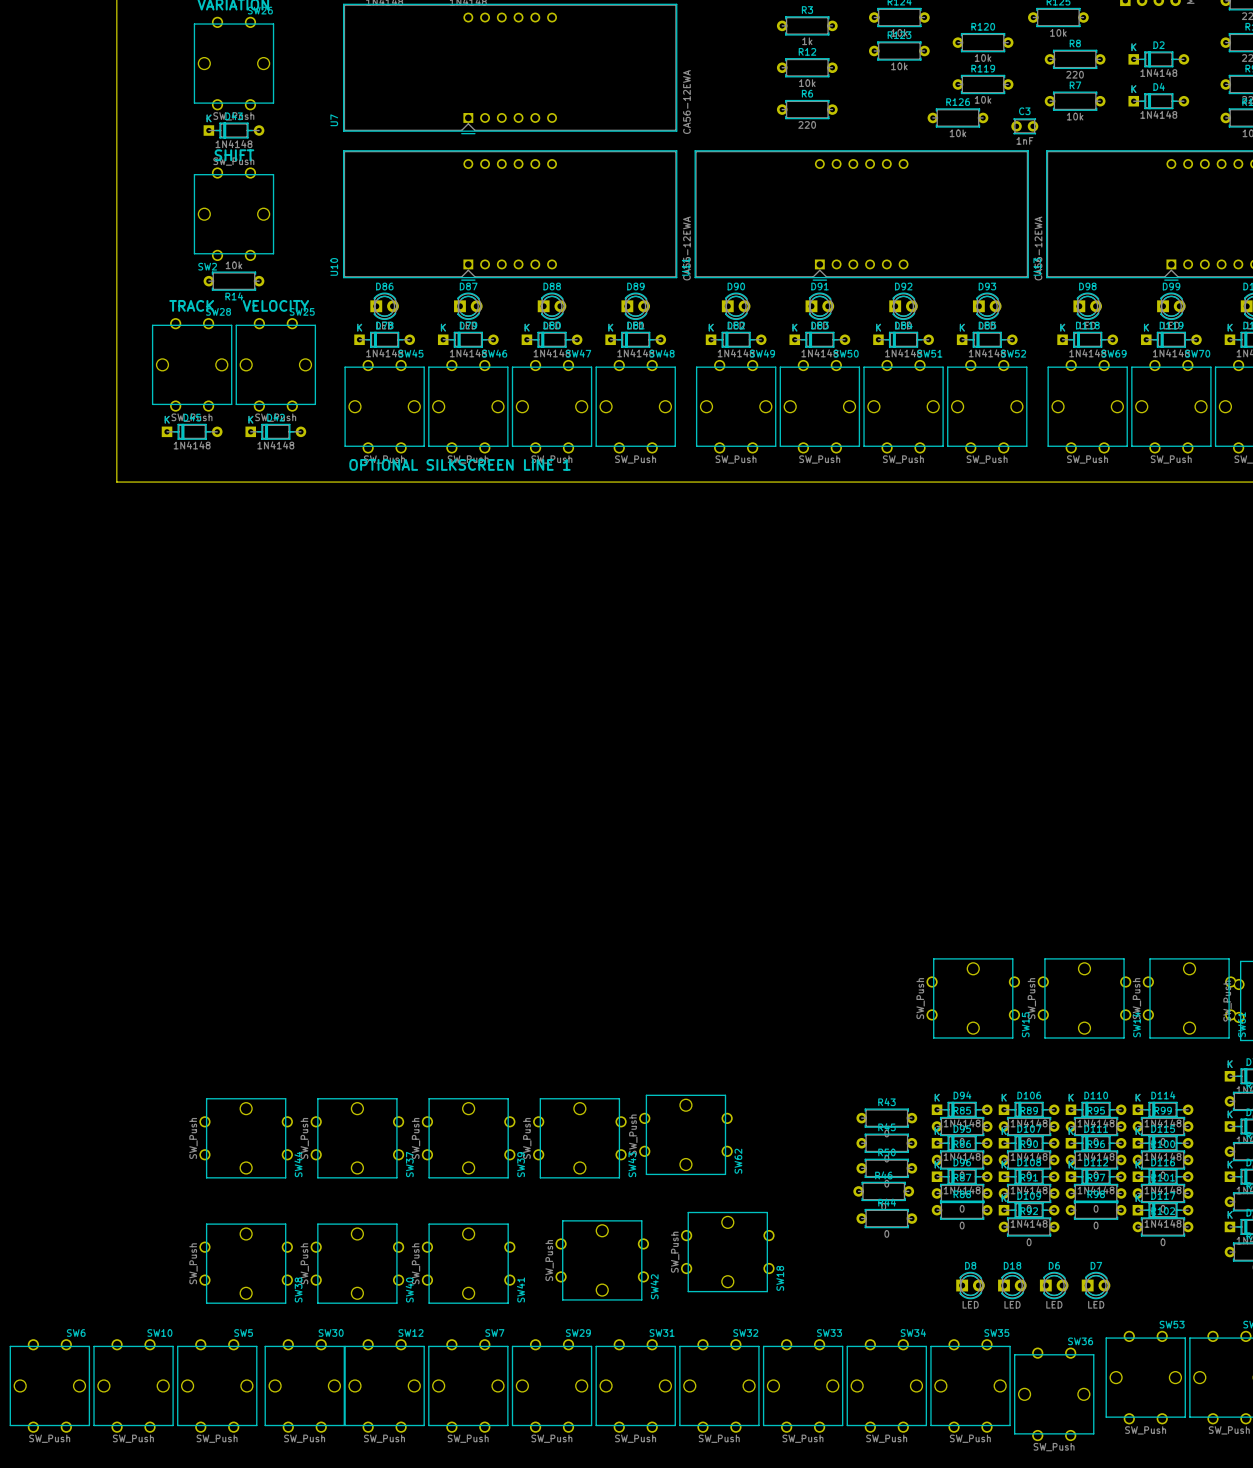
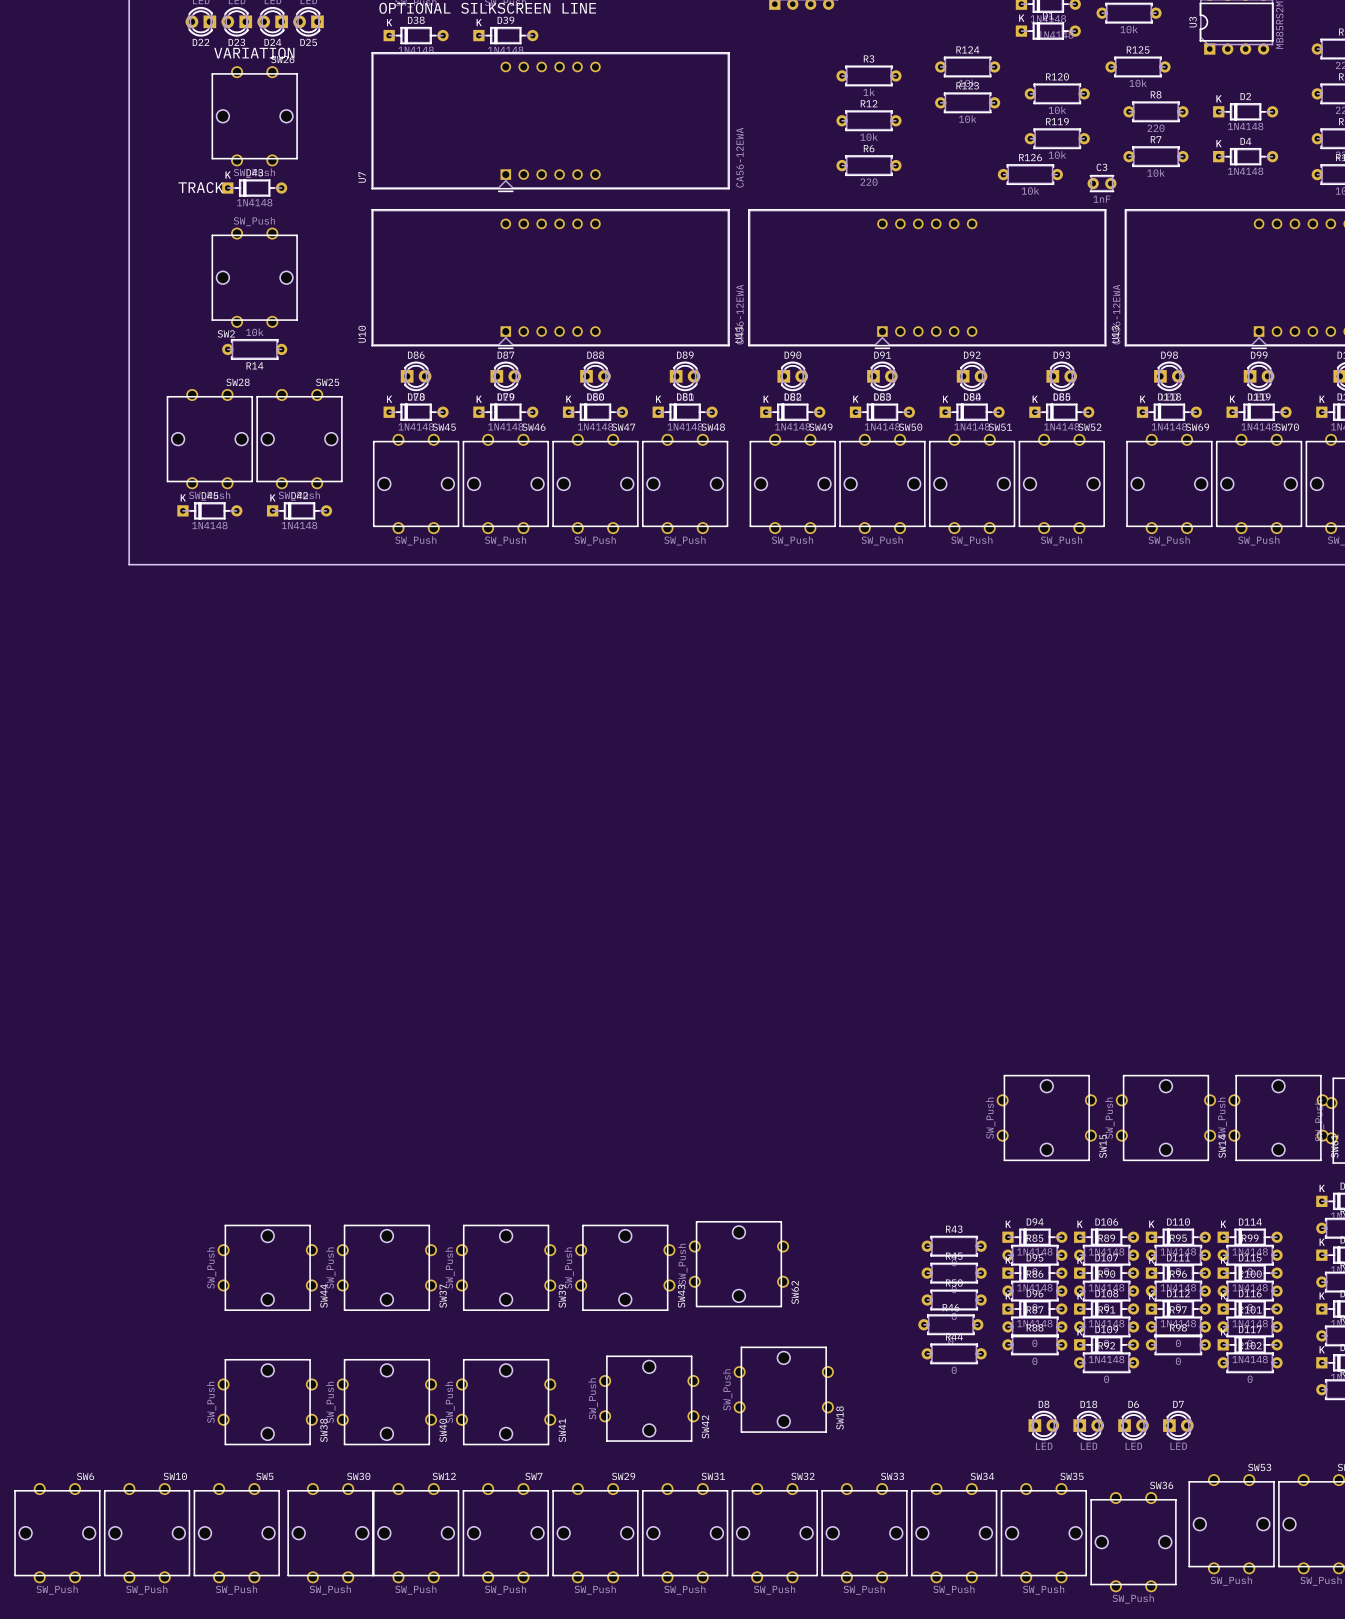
text: none -> TRACK (200, 187)
text: SHIFT (234, 155) -> none
text: TRACK (191, 305) -> none
text: VELOCITY (275, 305) -> none
text: OPTIONAL SILKSCREEN LINE 1 (459, 464) -> none

